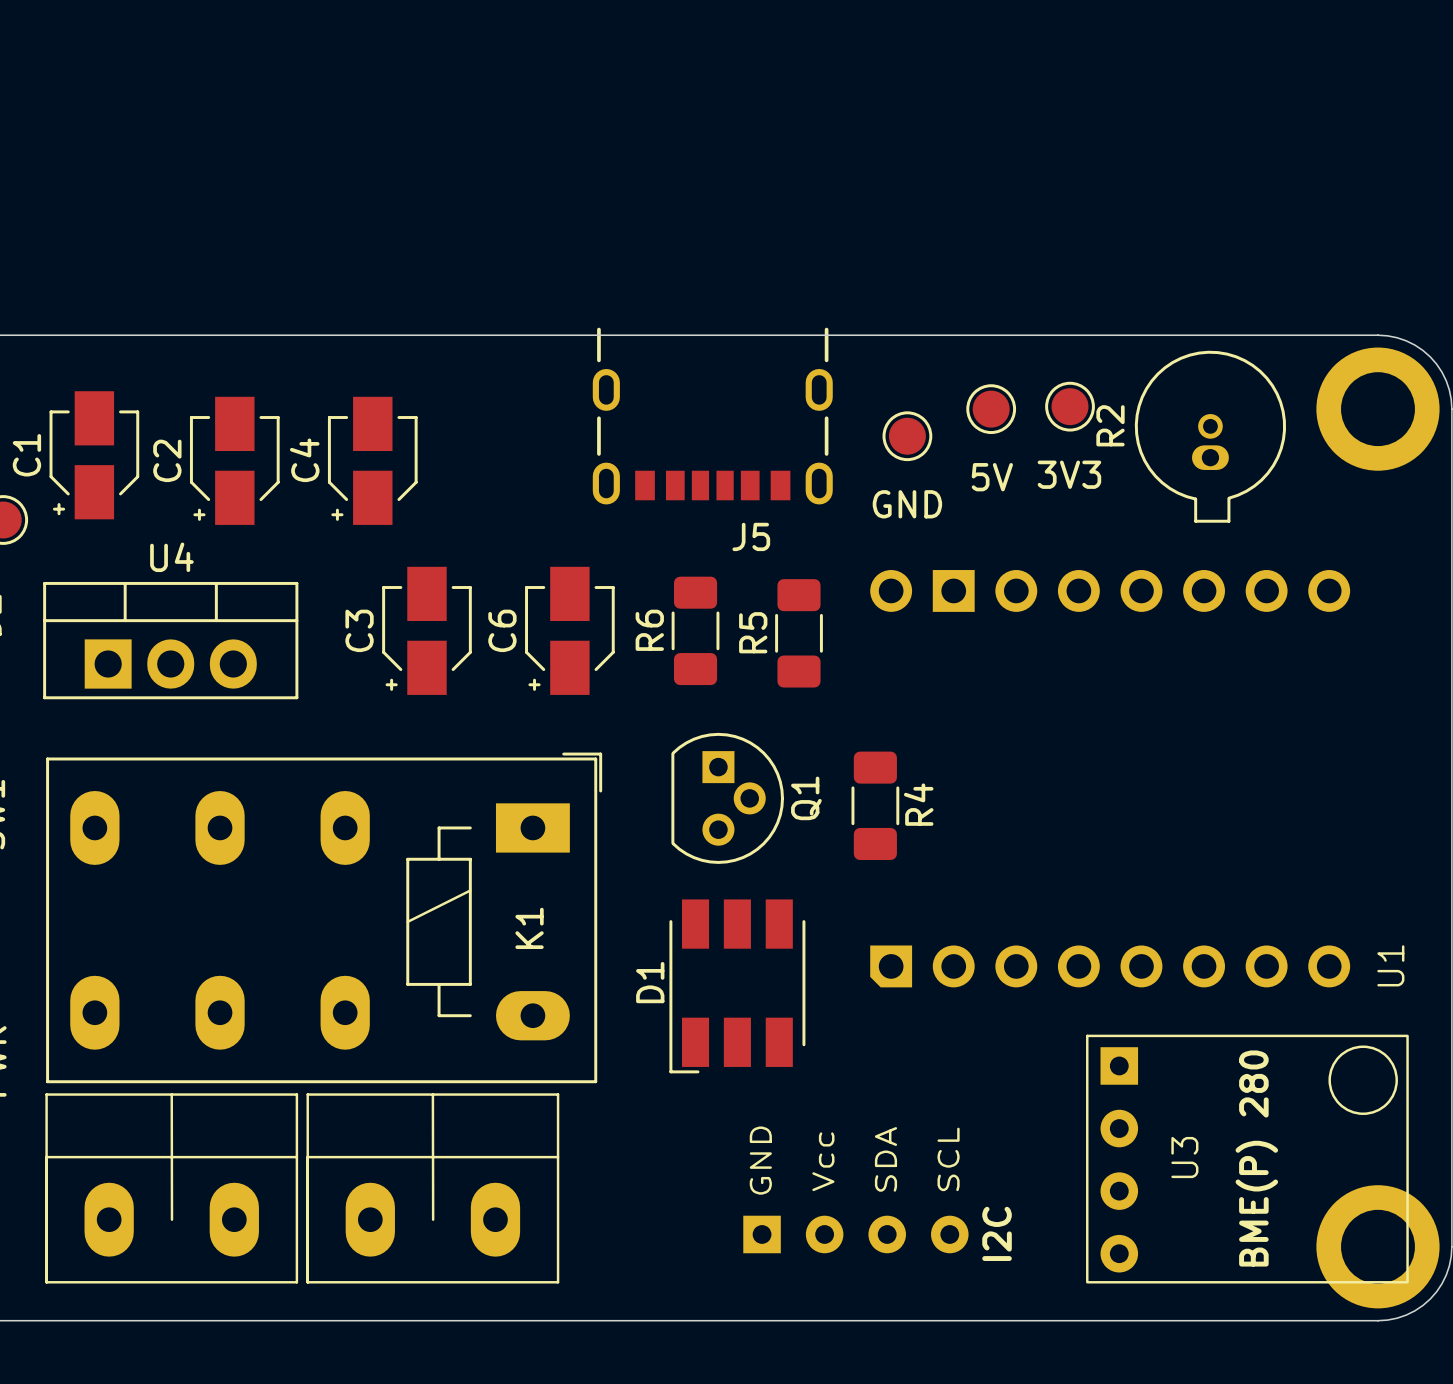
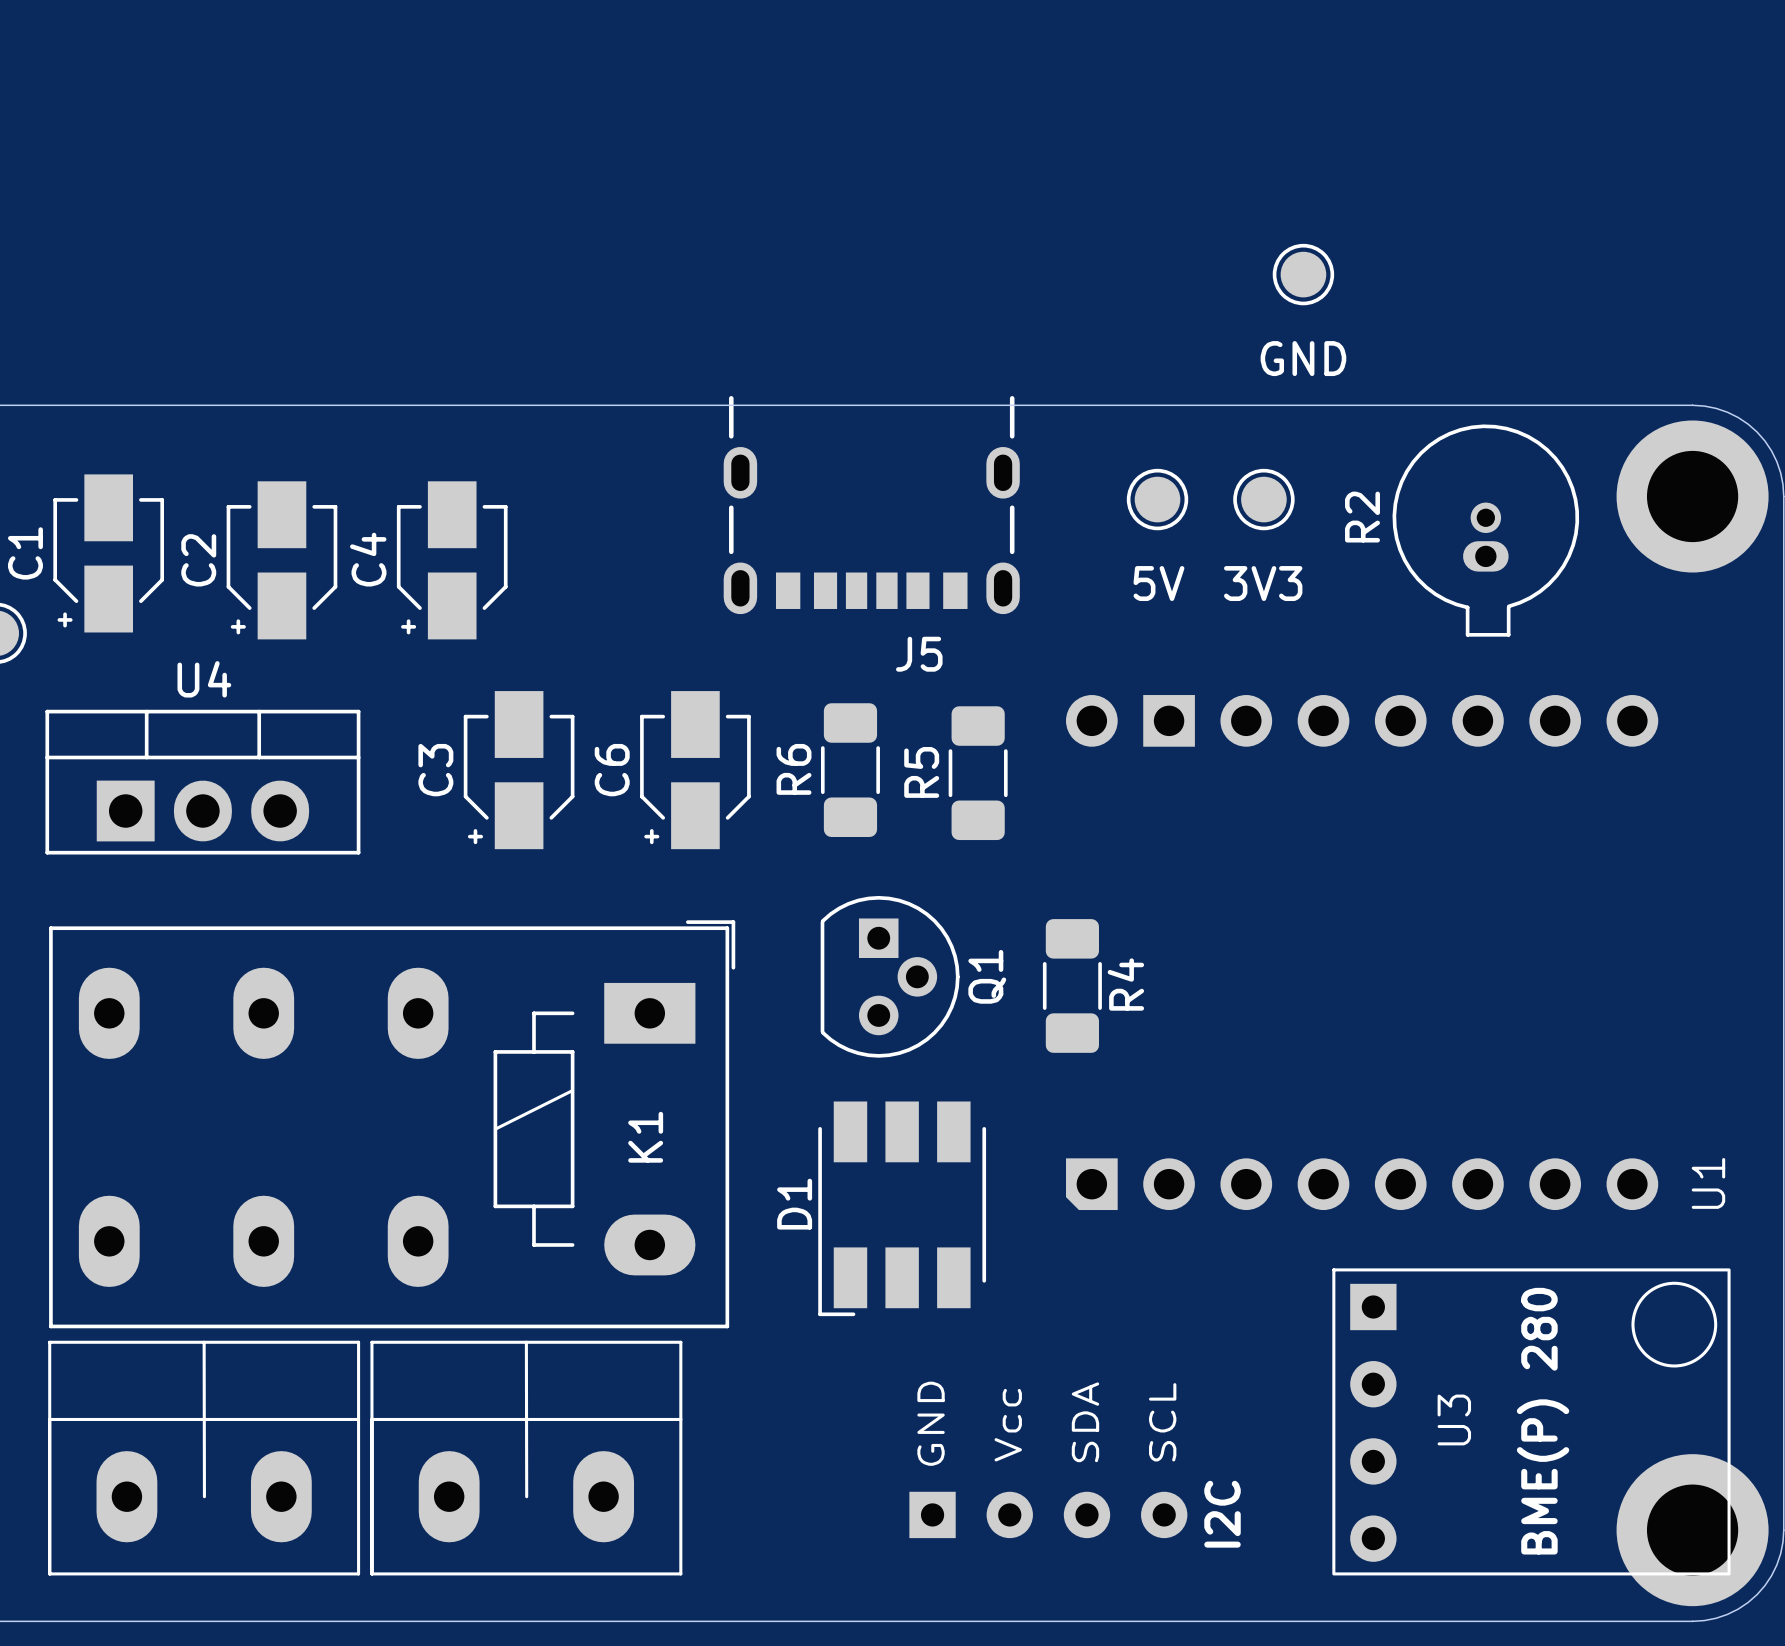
3V3 position: (1070, 406) -> (1263, 499)
5V position: (991, 409) -> (1157, 499)
GND position: (907, 436) -> (1303, 274)

